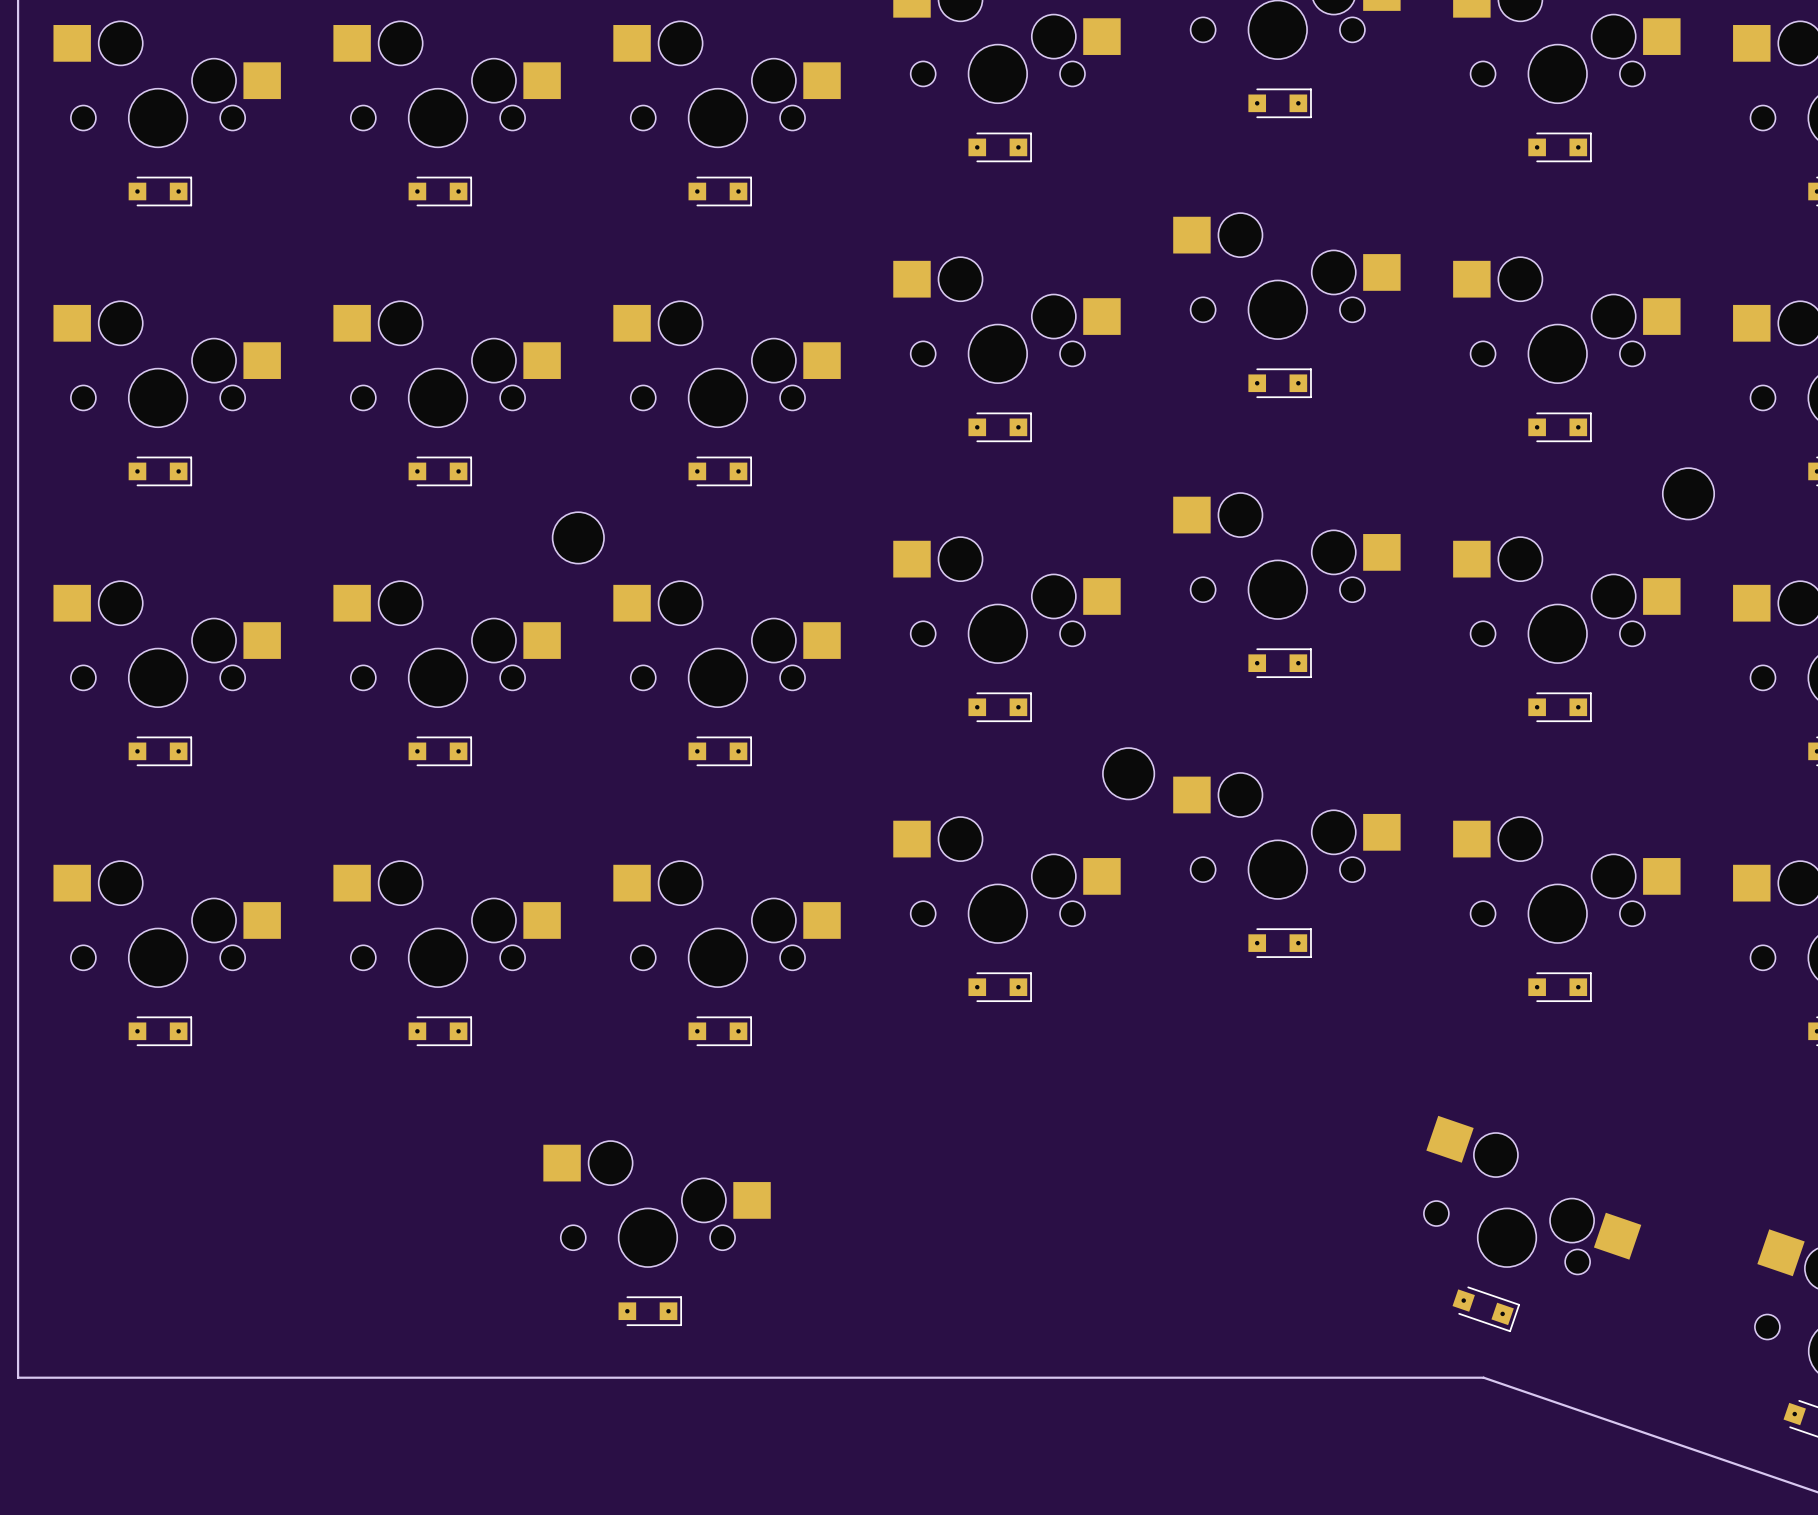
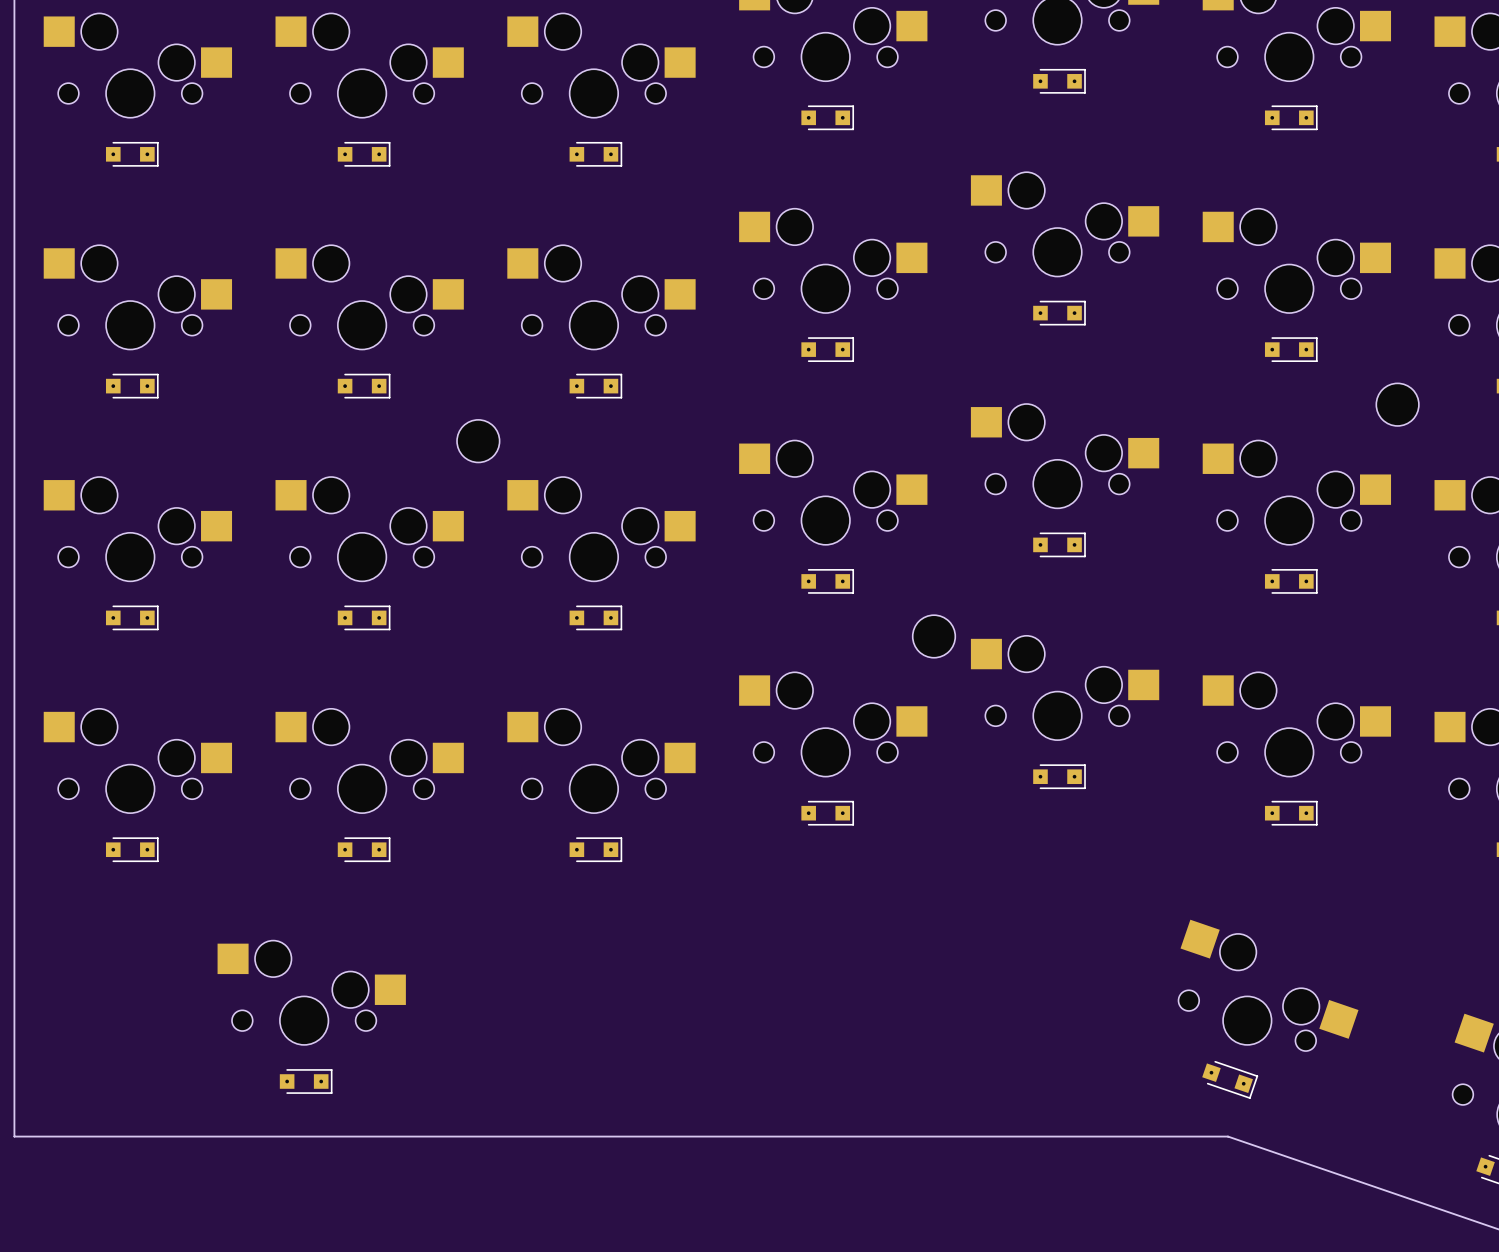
part position: (657, 1204) -> (311, 992)
part position: (650, 1311) -> (306, 1081)

